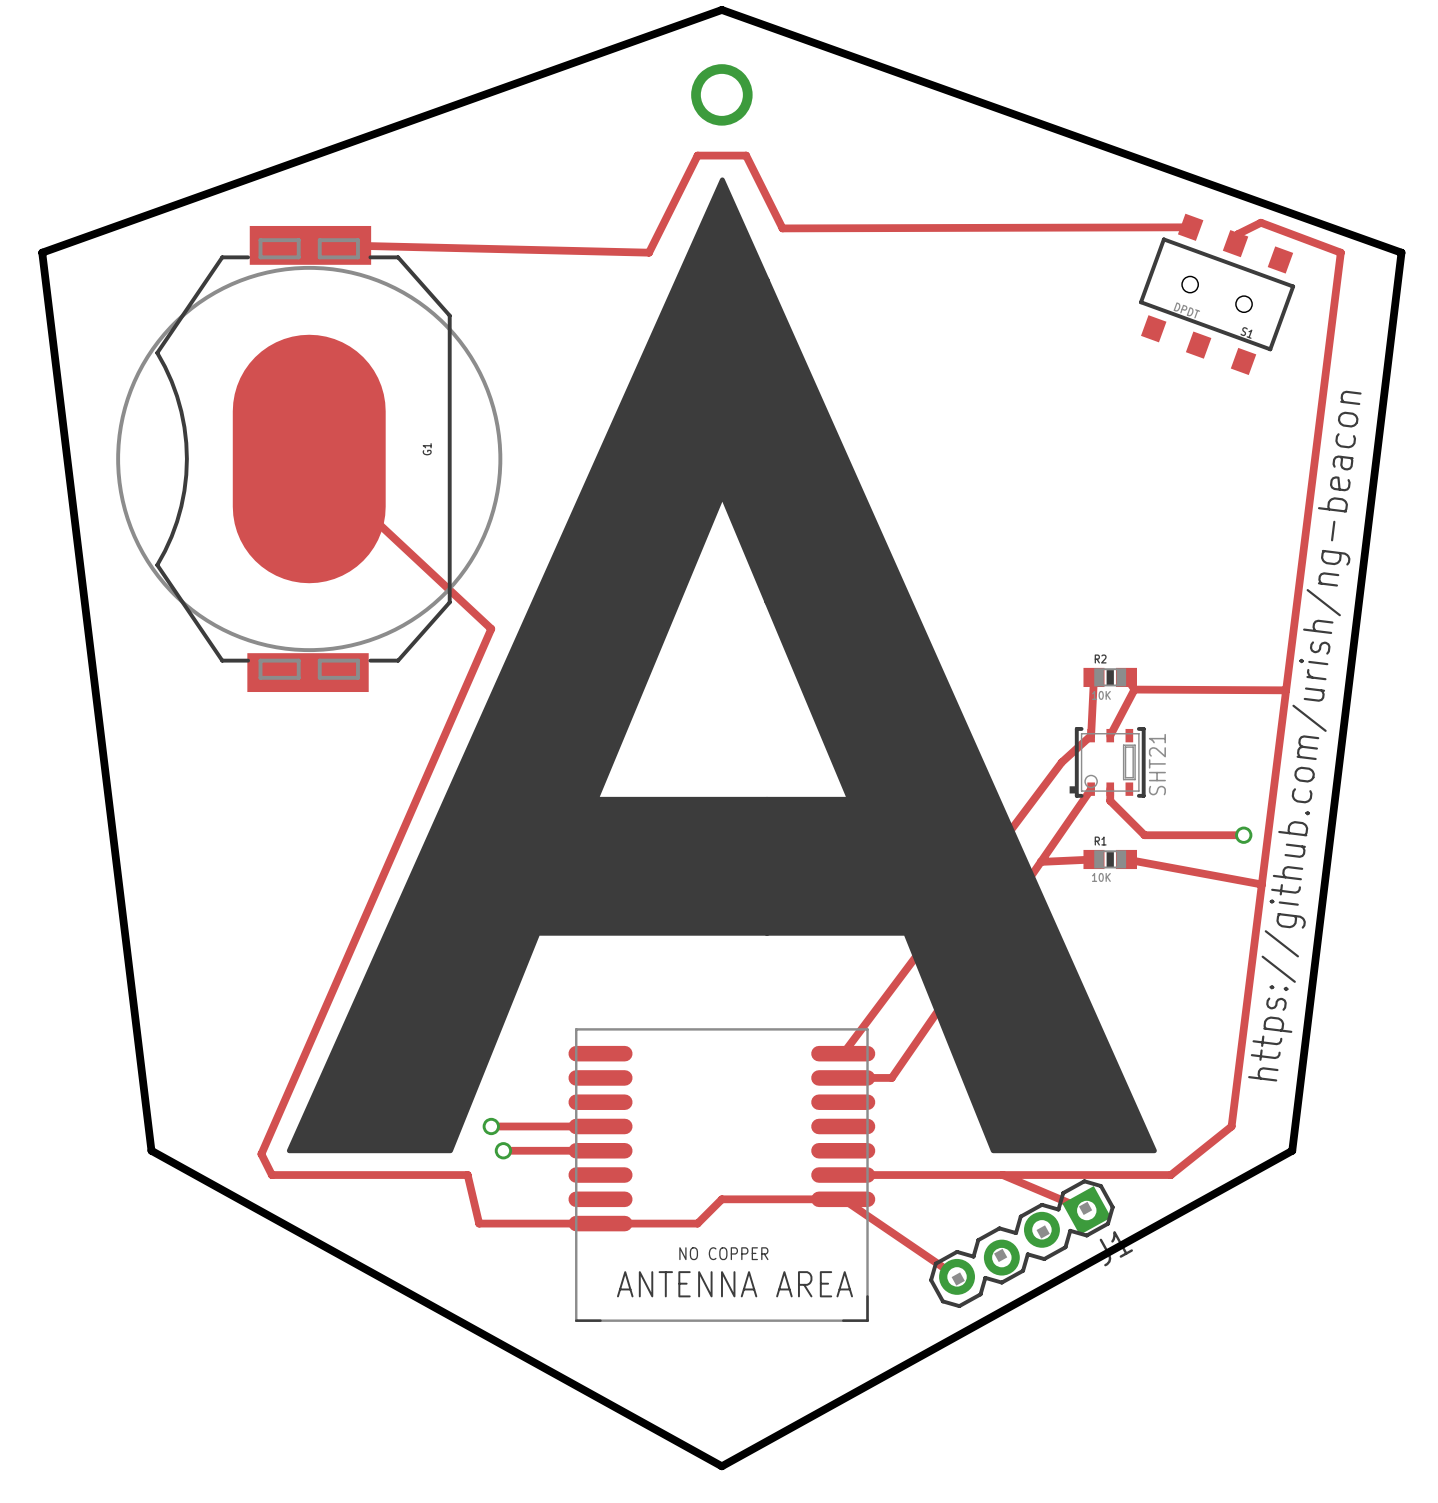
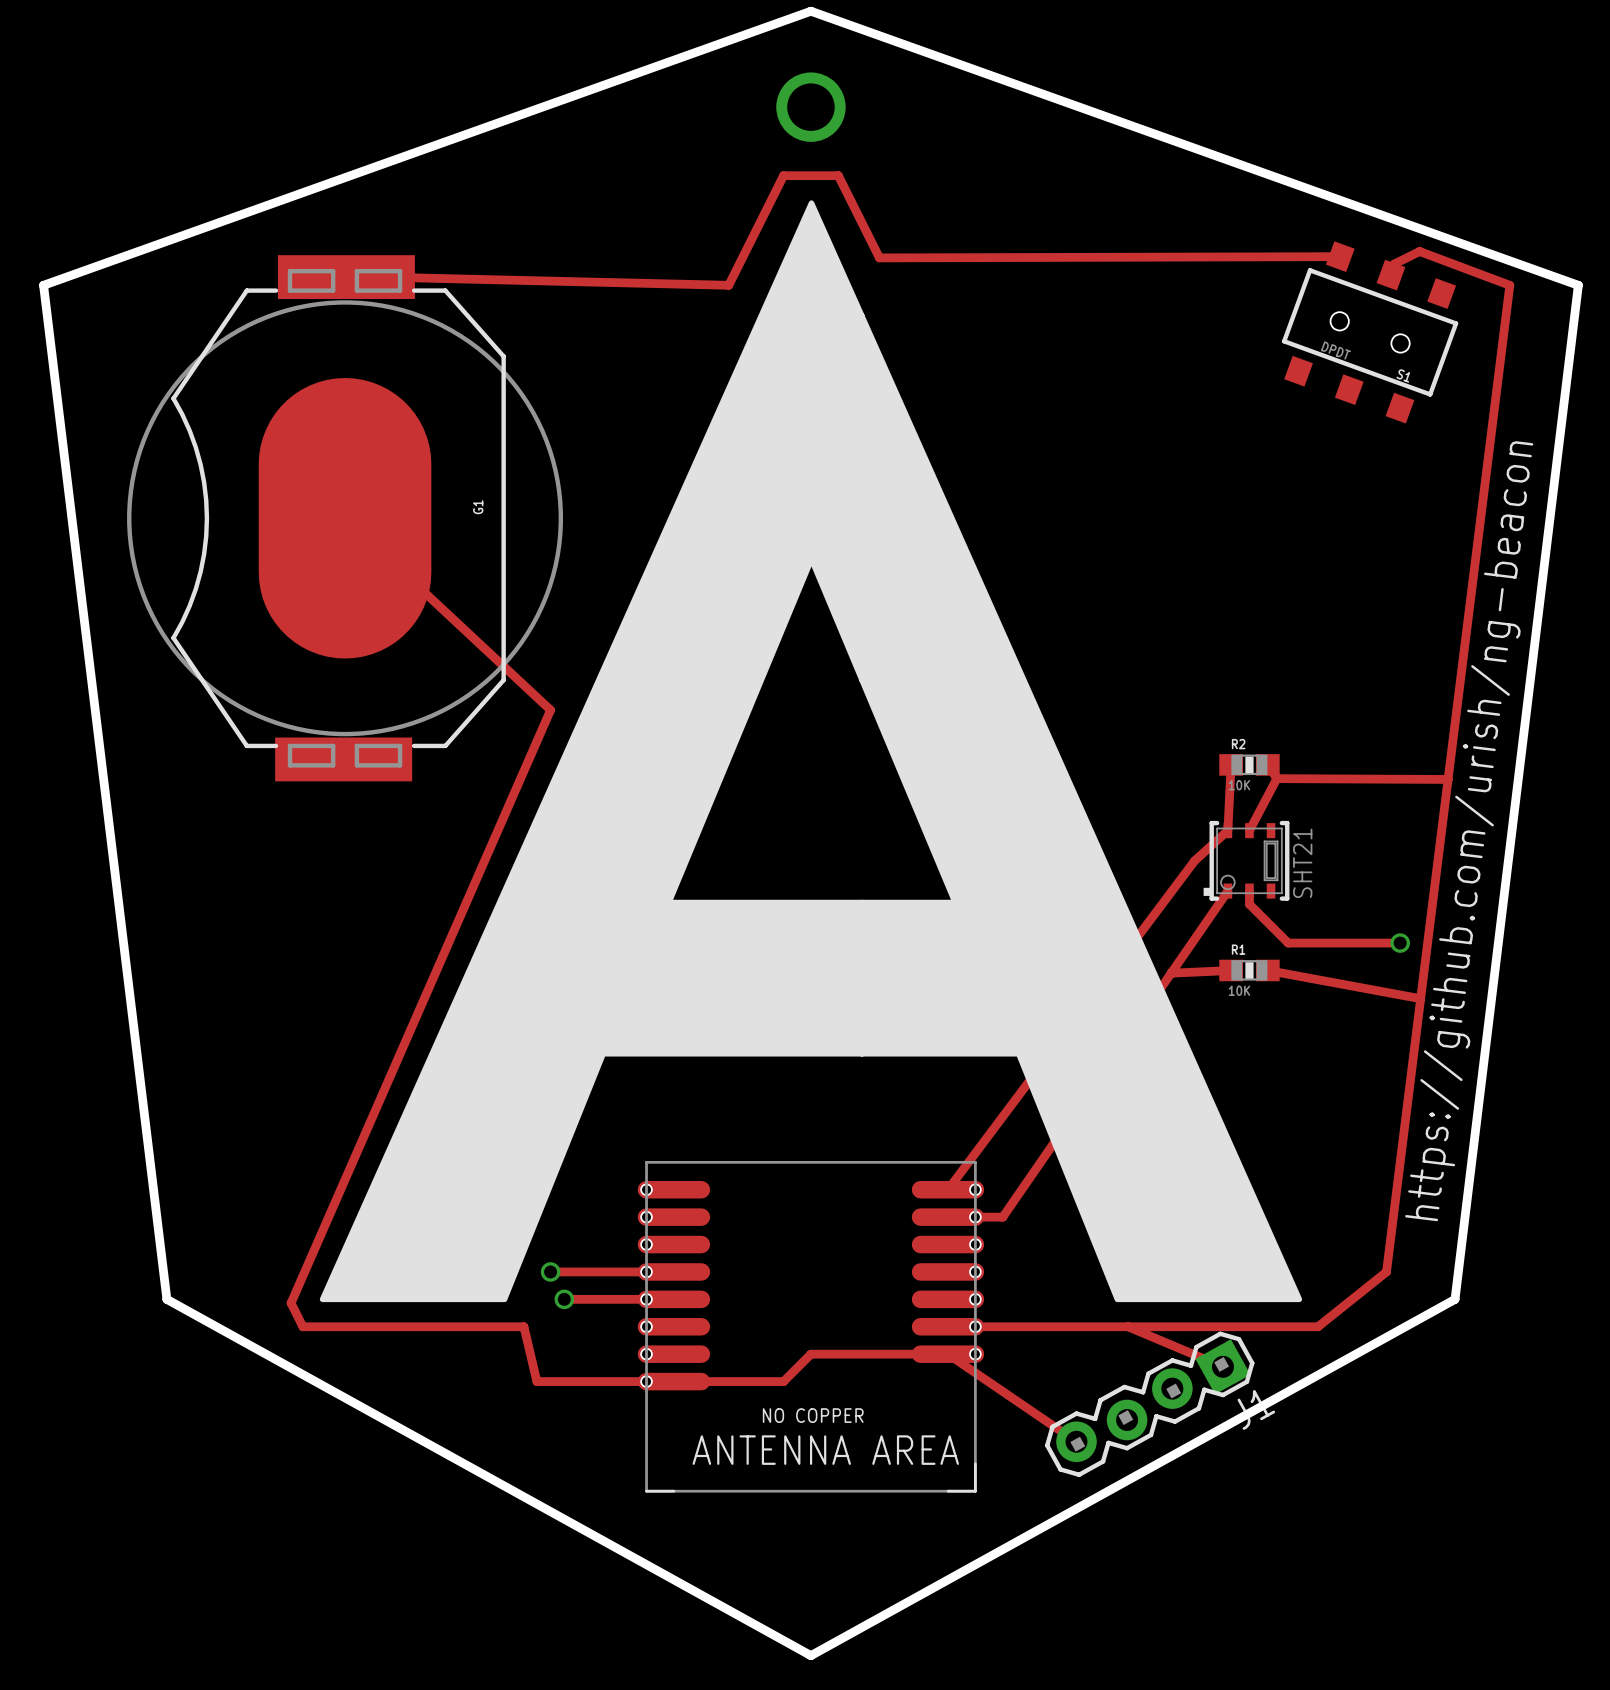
part footprint: [568, 1028, 876, 1322] -> [637, 1160, 985, 1493]

